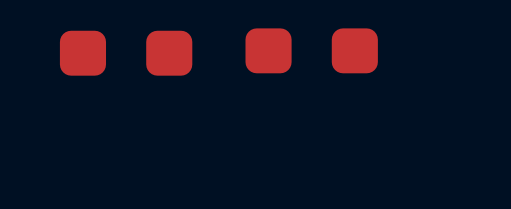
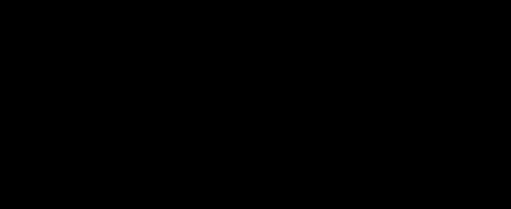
part: (311, 50) -> none
part: (126, 53) -> none

